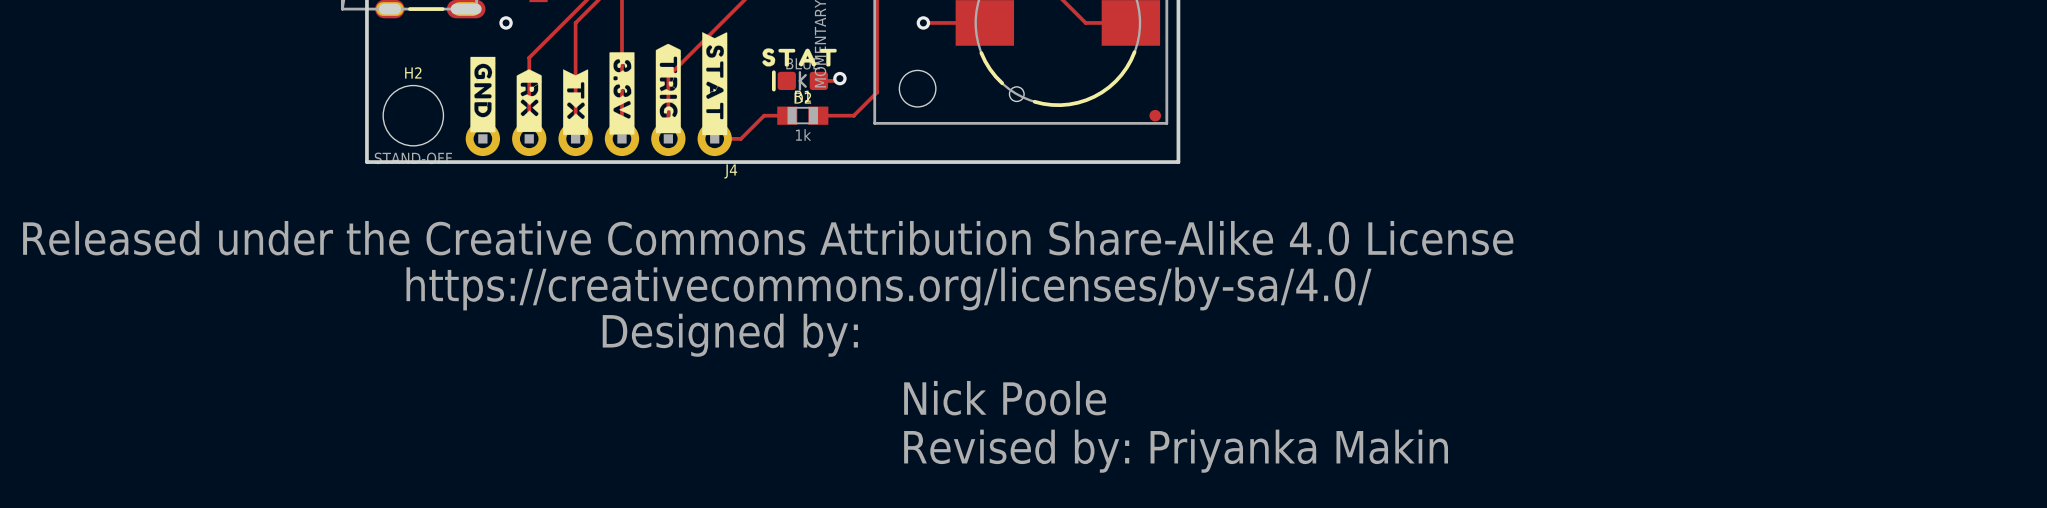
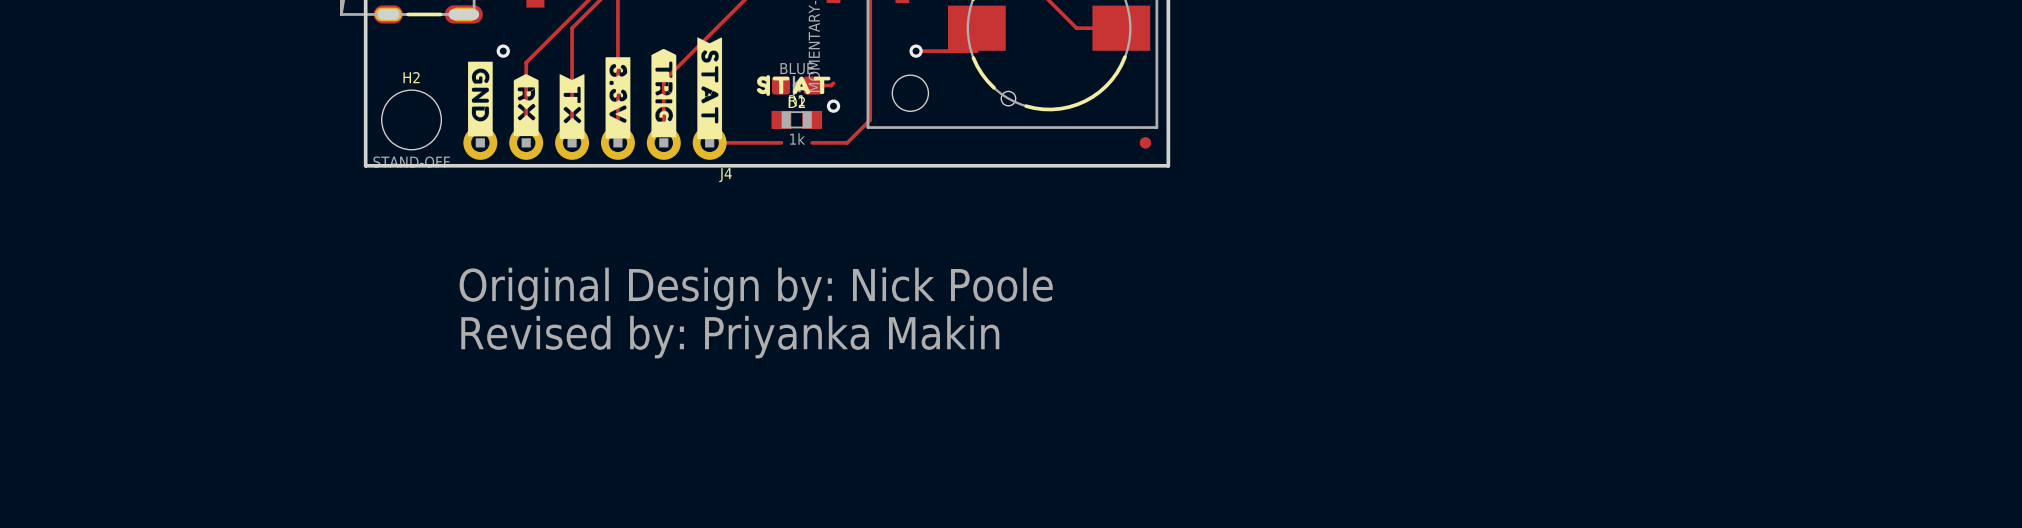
via position: (506, 22) -> (503, 51)
track: (923, 22) (984, 22) -> (916, 51) (976, 51)
via position: (923, 22) -> (916, 51)
drawing position: (799, 57) -> (793, 85)
via position: (839, 78) -> (833, 106)
track: (877, 92) (853, 115) (818, 115) -> (870, 96) (870, 119) (847, 142) (812, 142)
track: (787, 115) (764, 115) (740, 138) -> (781, 142) (735, 142)
part position: (1155, 115) -> (1145, 142)
drawing: [23, 220, 1514, 357] -> none
text: none -> Original Design by: Nick Poole (756, 288)
text: Nick Poole (1005, 398) -> none
text position: Revised by: Priyanka Makin (1176, 451) -> Revised by: Priyanka Makin (730, 337)

